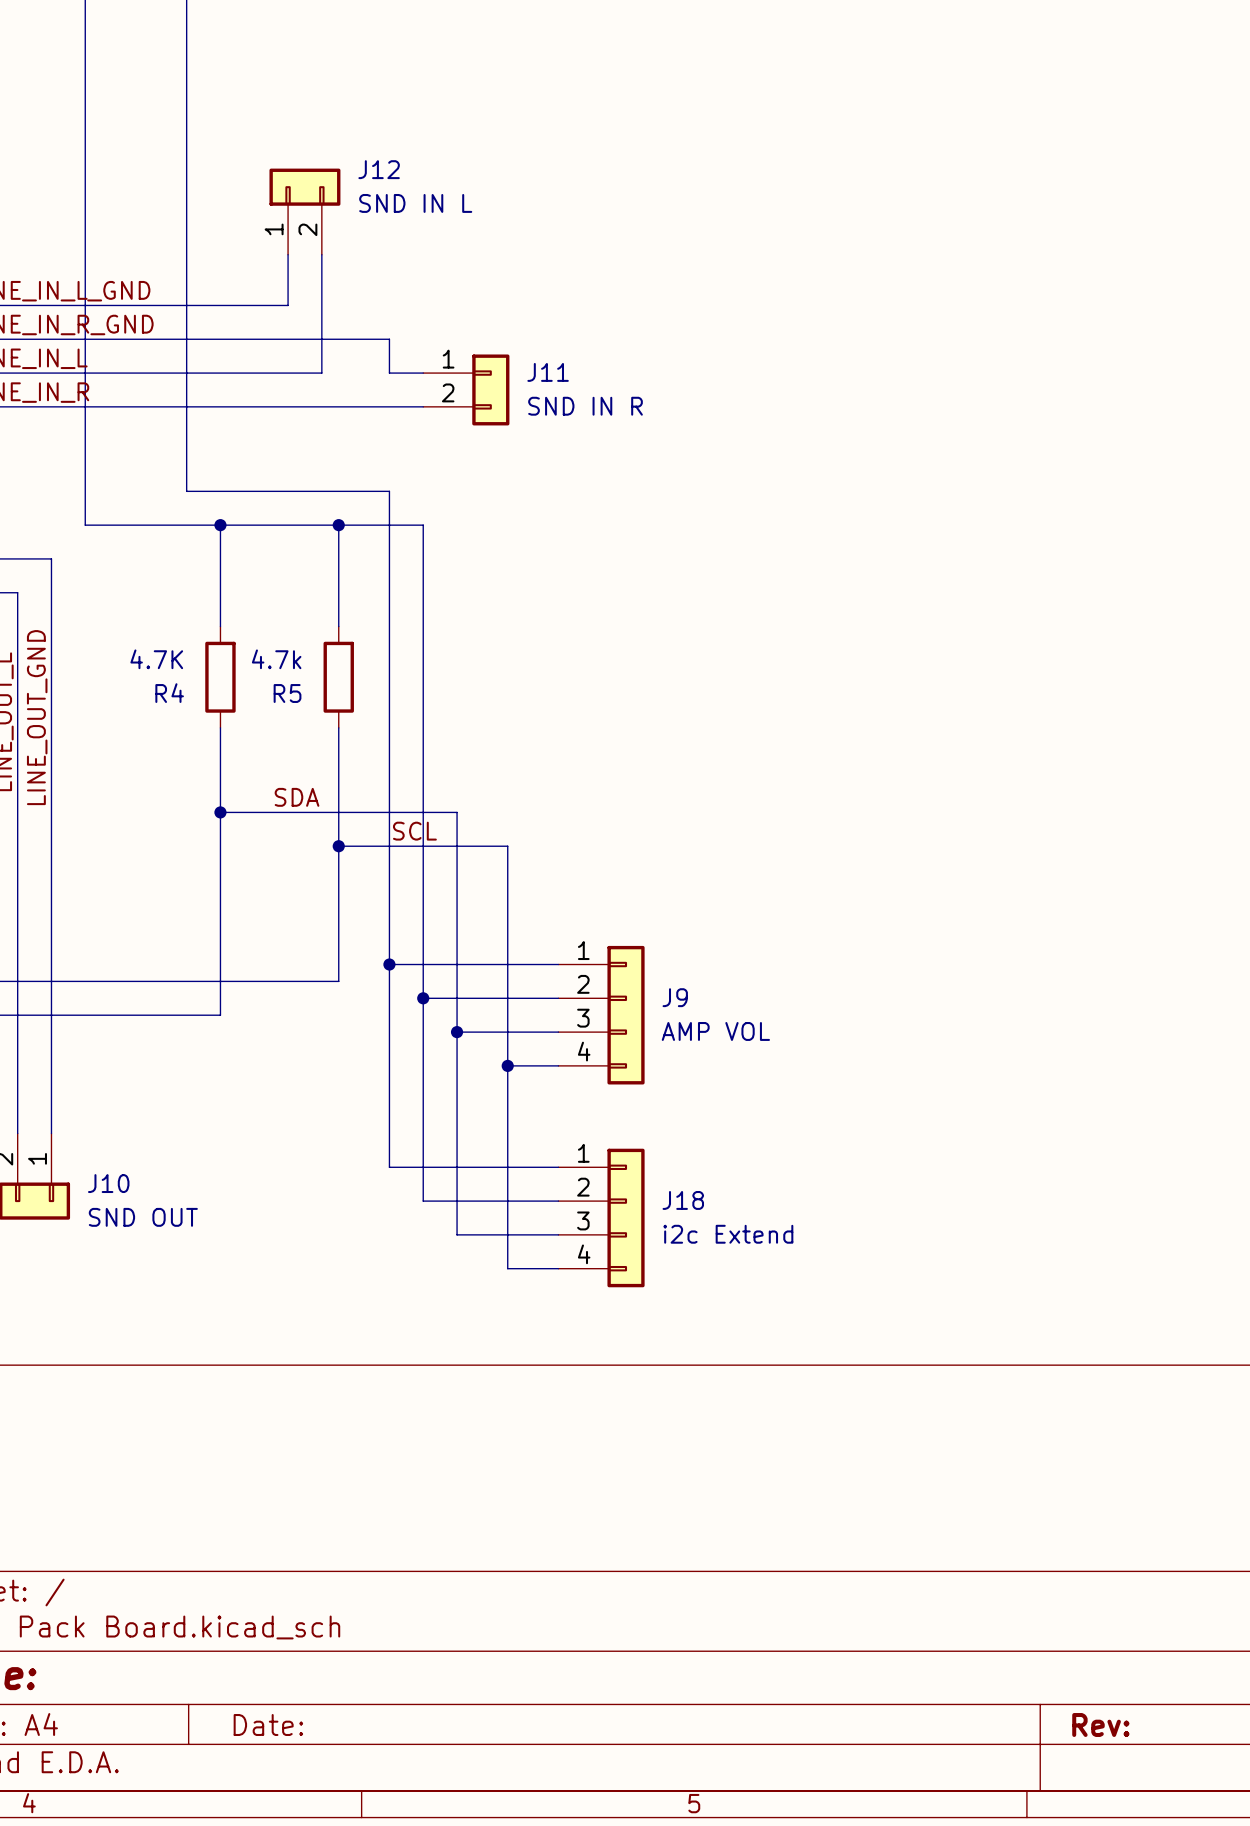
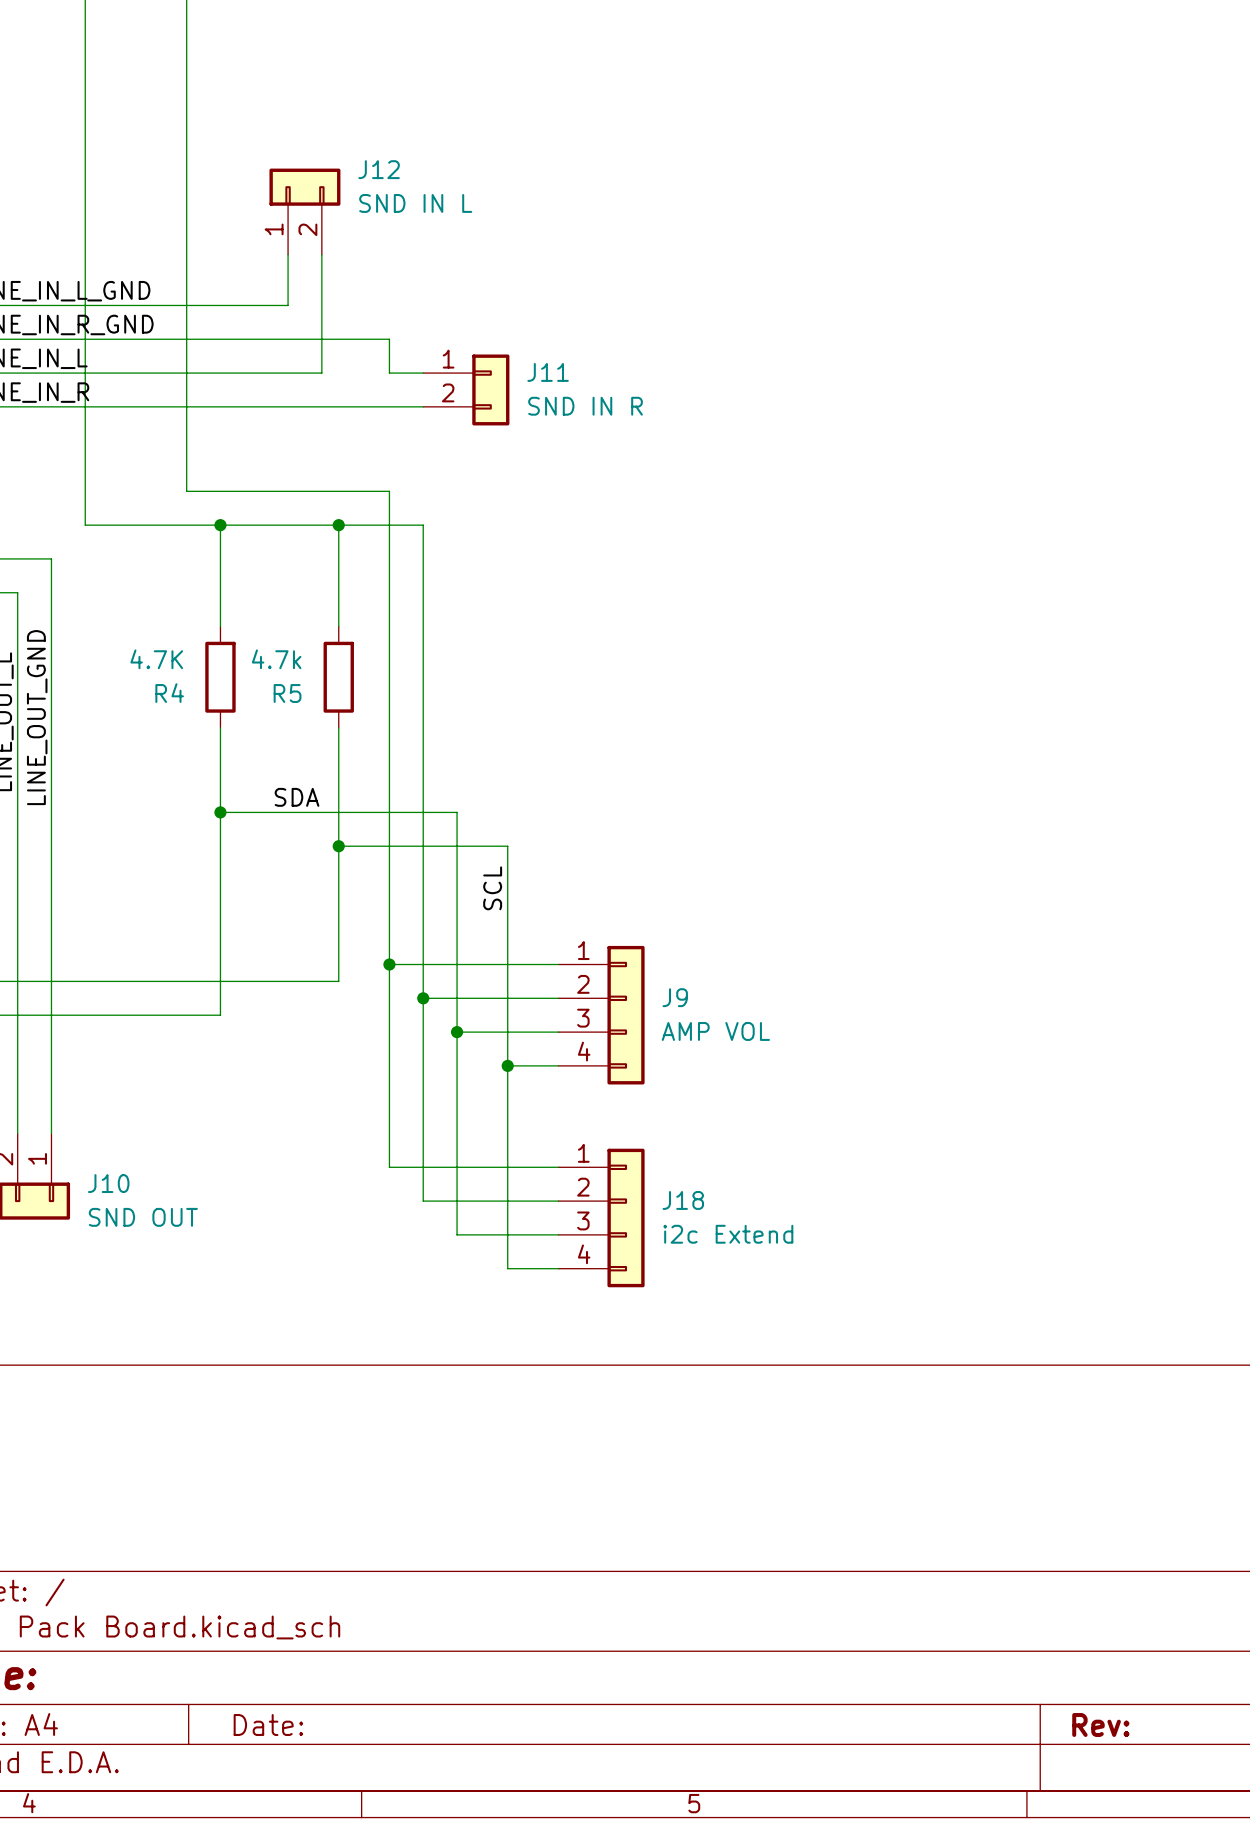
label rotation: 0° (414, 831) -> 90° counterclockwise (492, 888)
label position: SCL (414, 831) -> SCL (492, 888)

